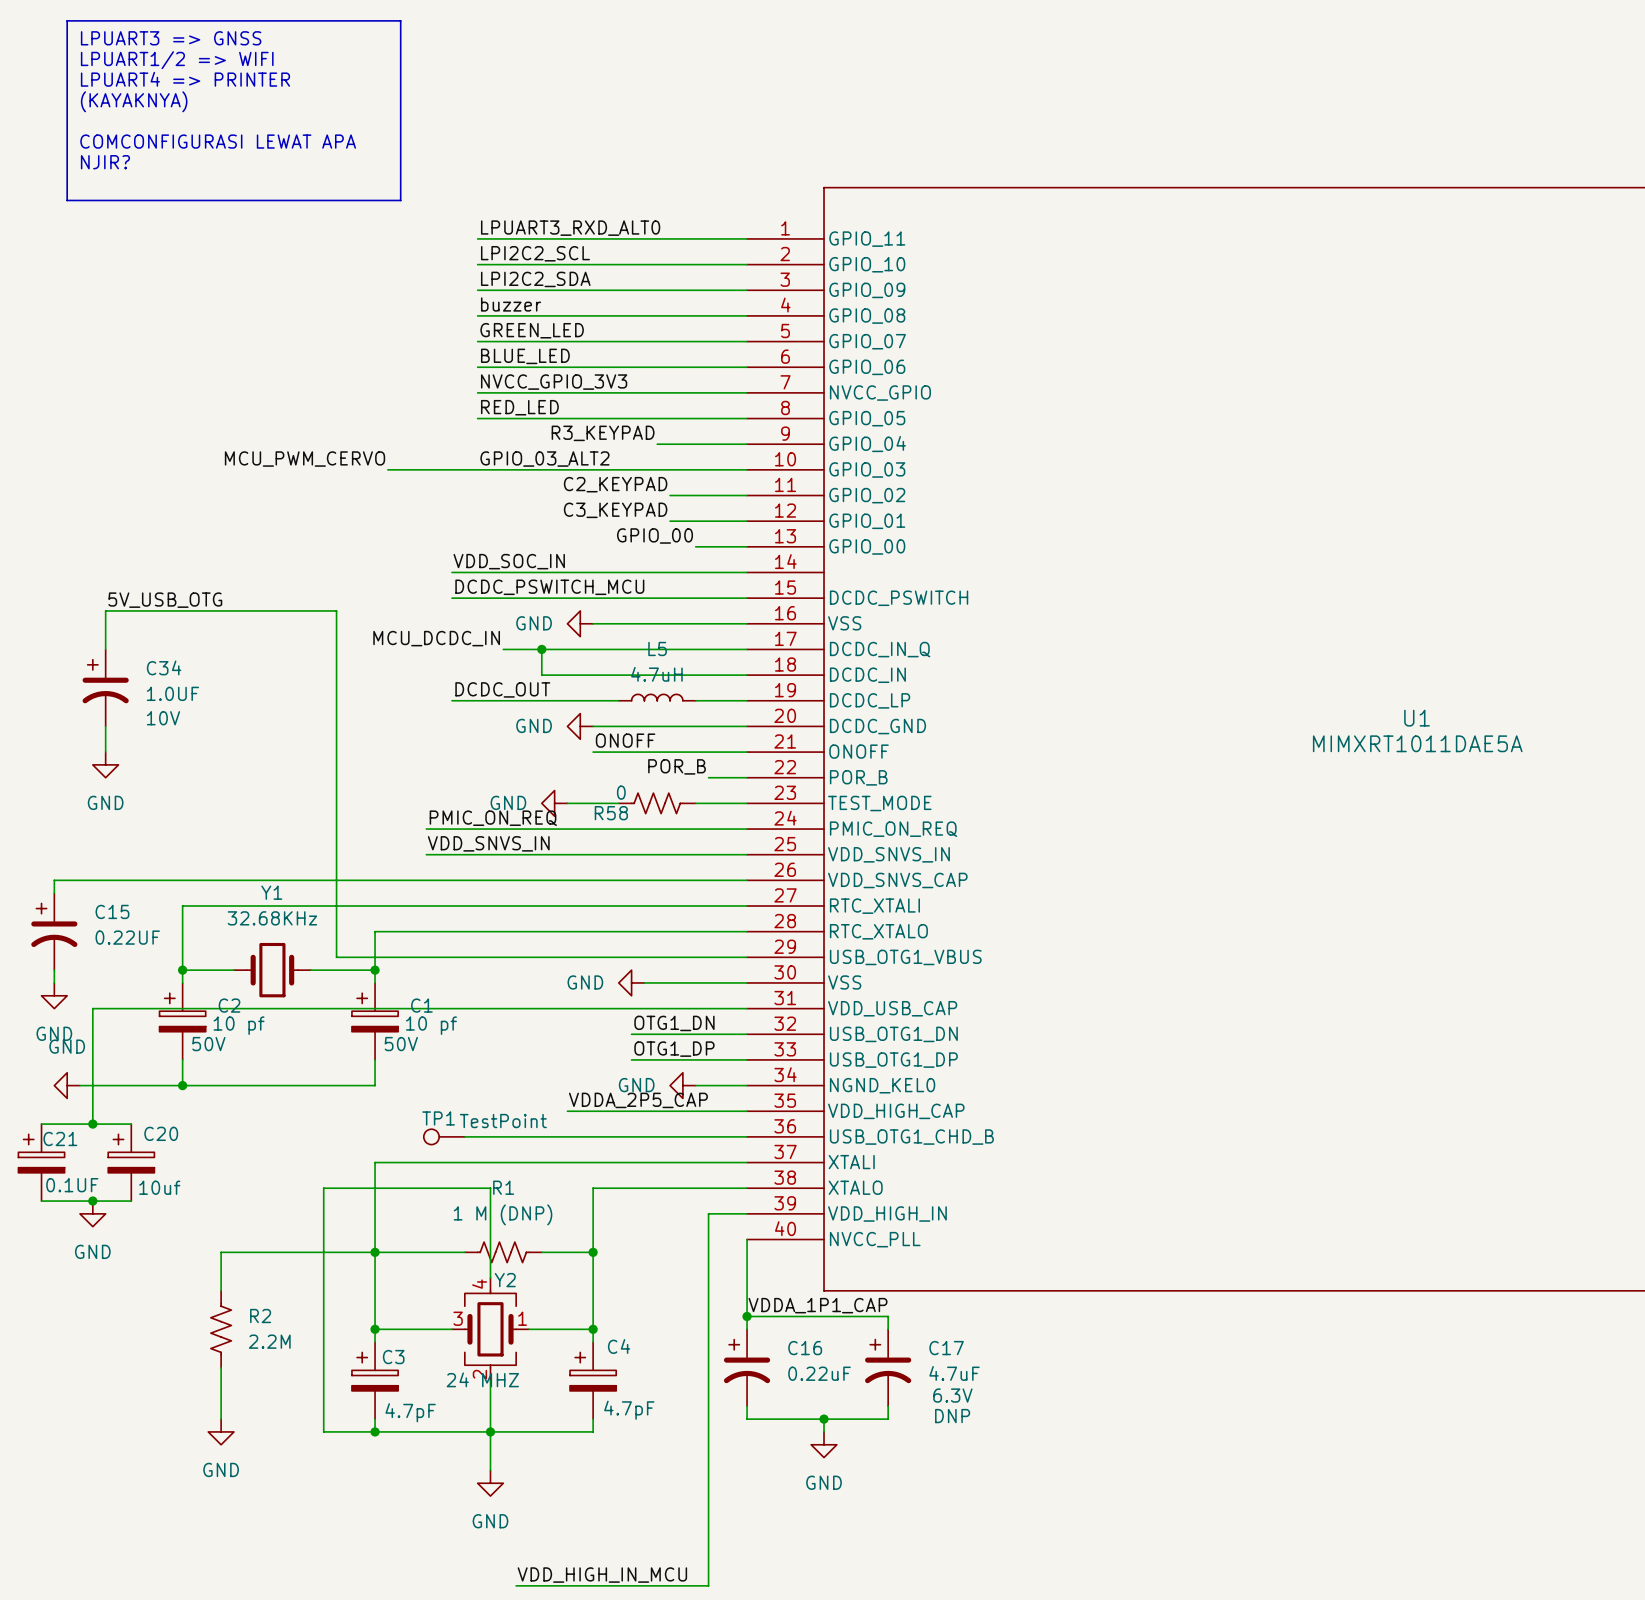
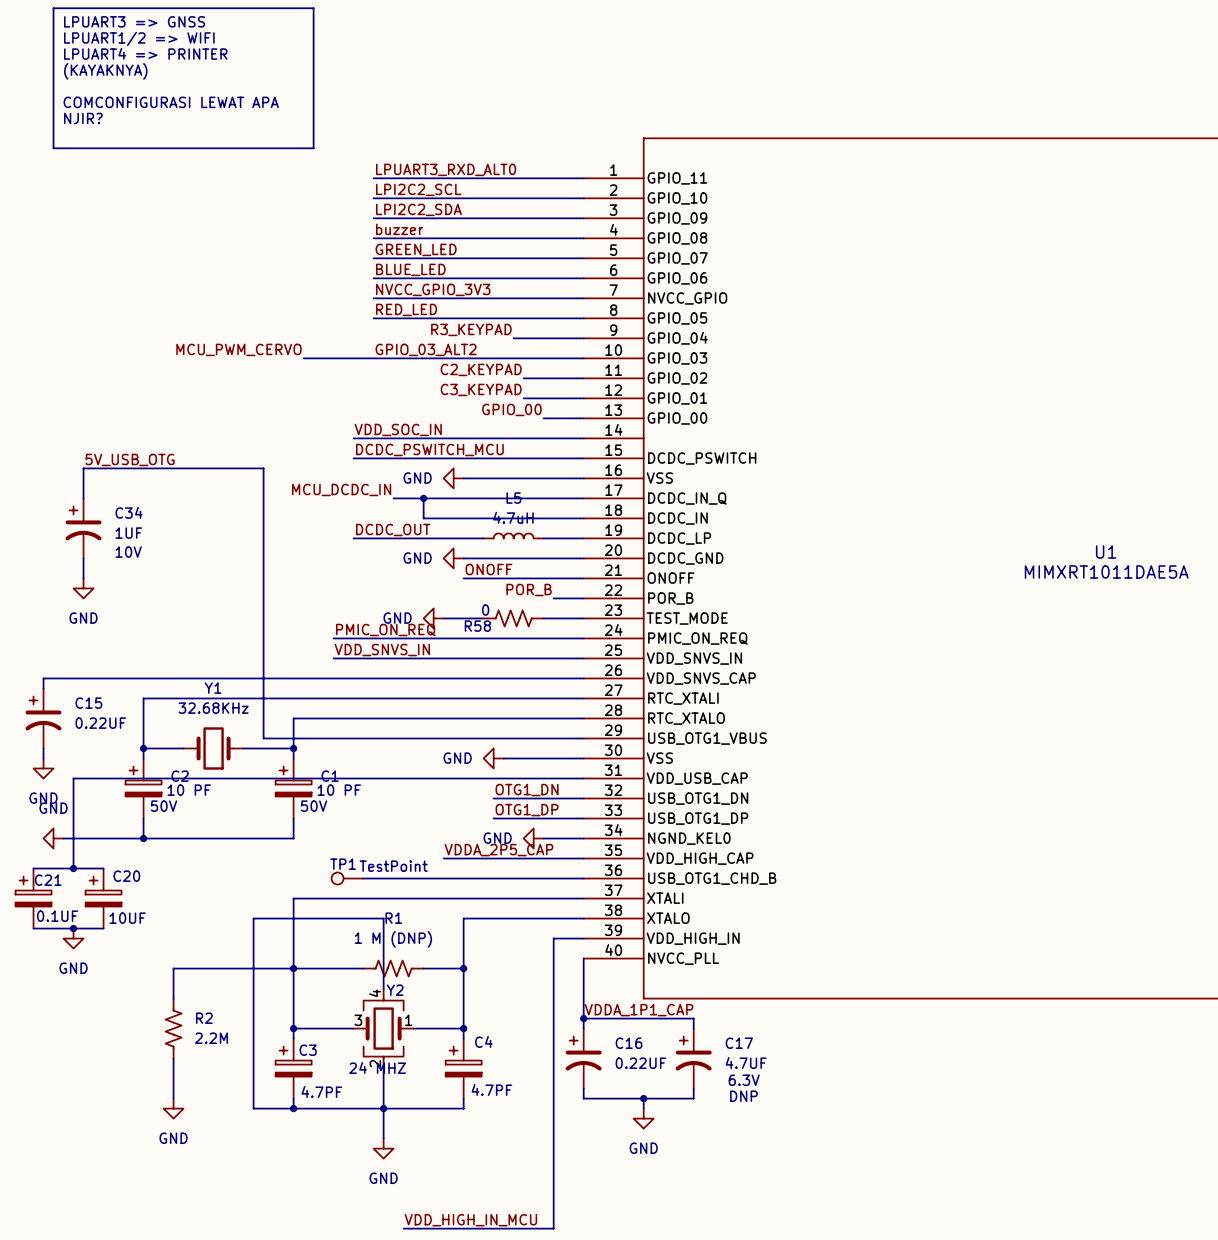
C34 value: 1.0UF (172, 693) -> 1UF (128, 533)
C2 value: 10 pf (239, 1025) -> 10 PF (189, 790)
C1 value: 10 pf (431, 1025) -> 10 PF (339, 790)
C20 value: 10uf (159, 1187) -> 10UF (127, 918)
C16 value: 0.22uF (819, 1373) -> 0.22UF (640, 1063)
C17 value: 4.7uF (954, 1373) -> 4.7UF (746, 1062)
C4 value: 4.7pF (629, 1410) -> 4.7PF (491, 1089)
C3 value: 4.7pF (410, 1412) -> 4.7PF (321, 1091)

